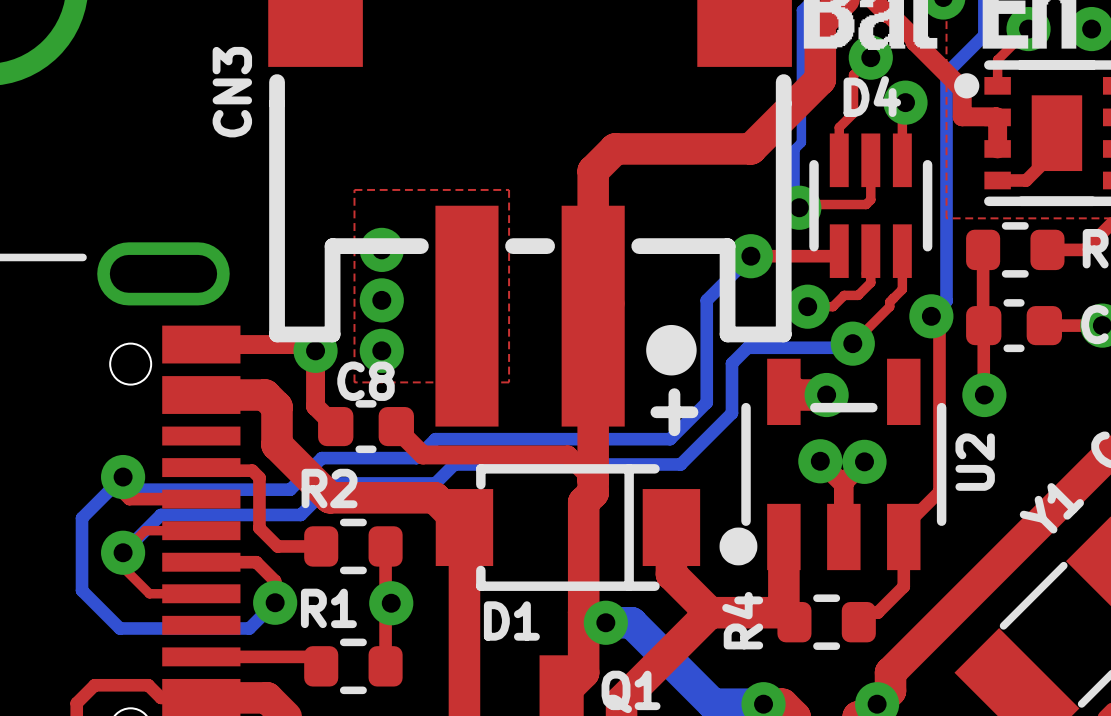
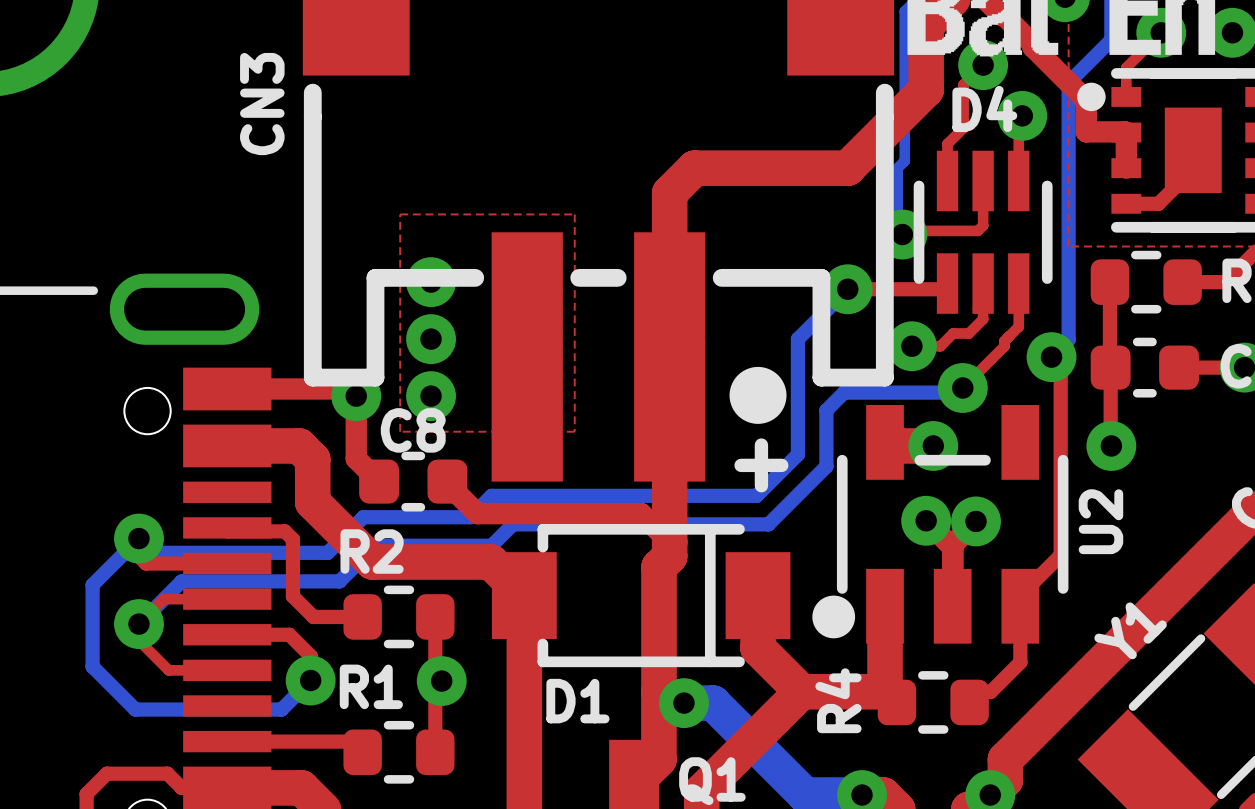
Y1 name position: Y1 (1051, 508) -> Y1 (1130, 630)

